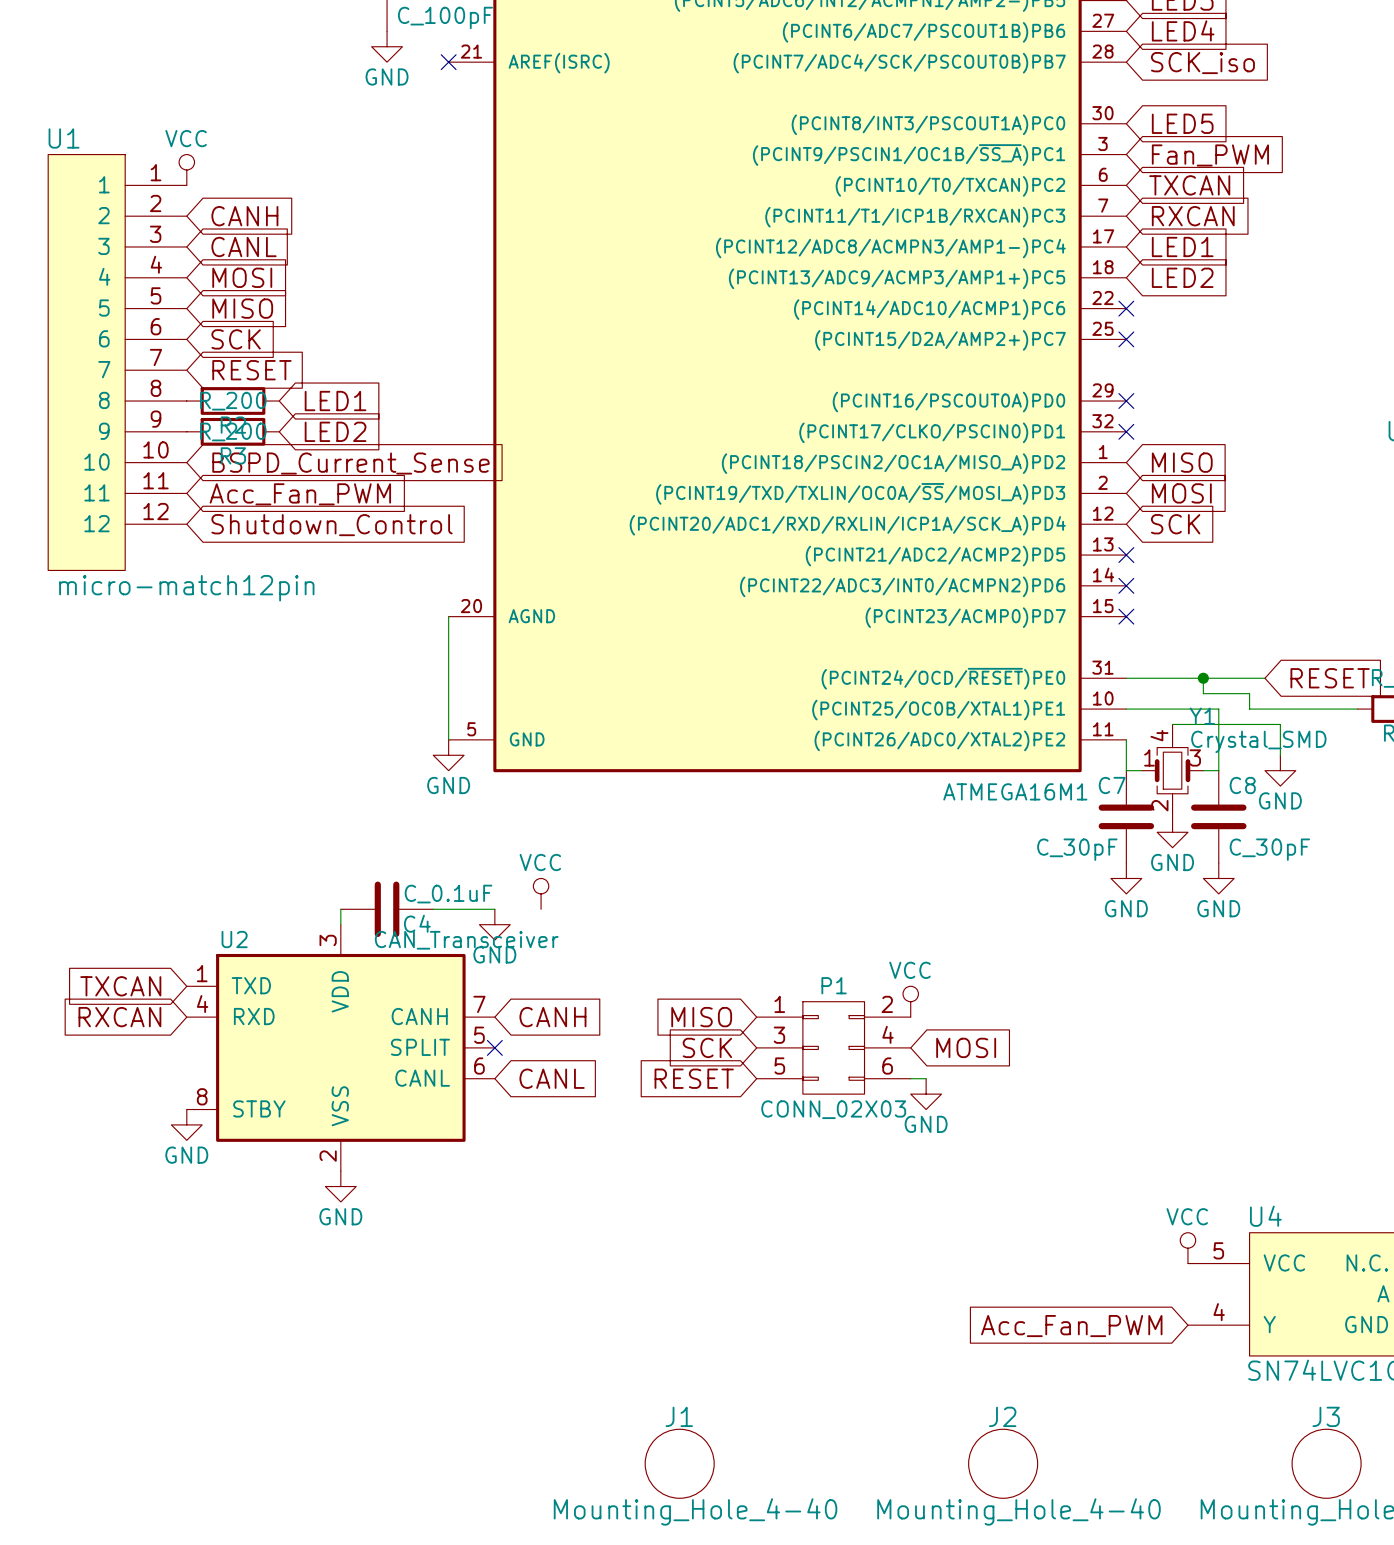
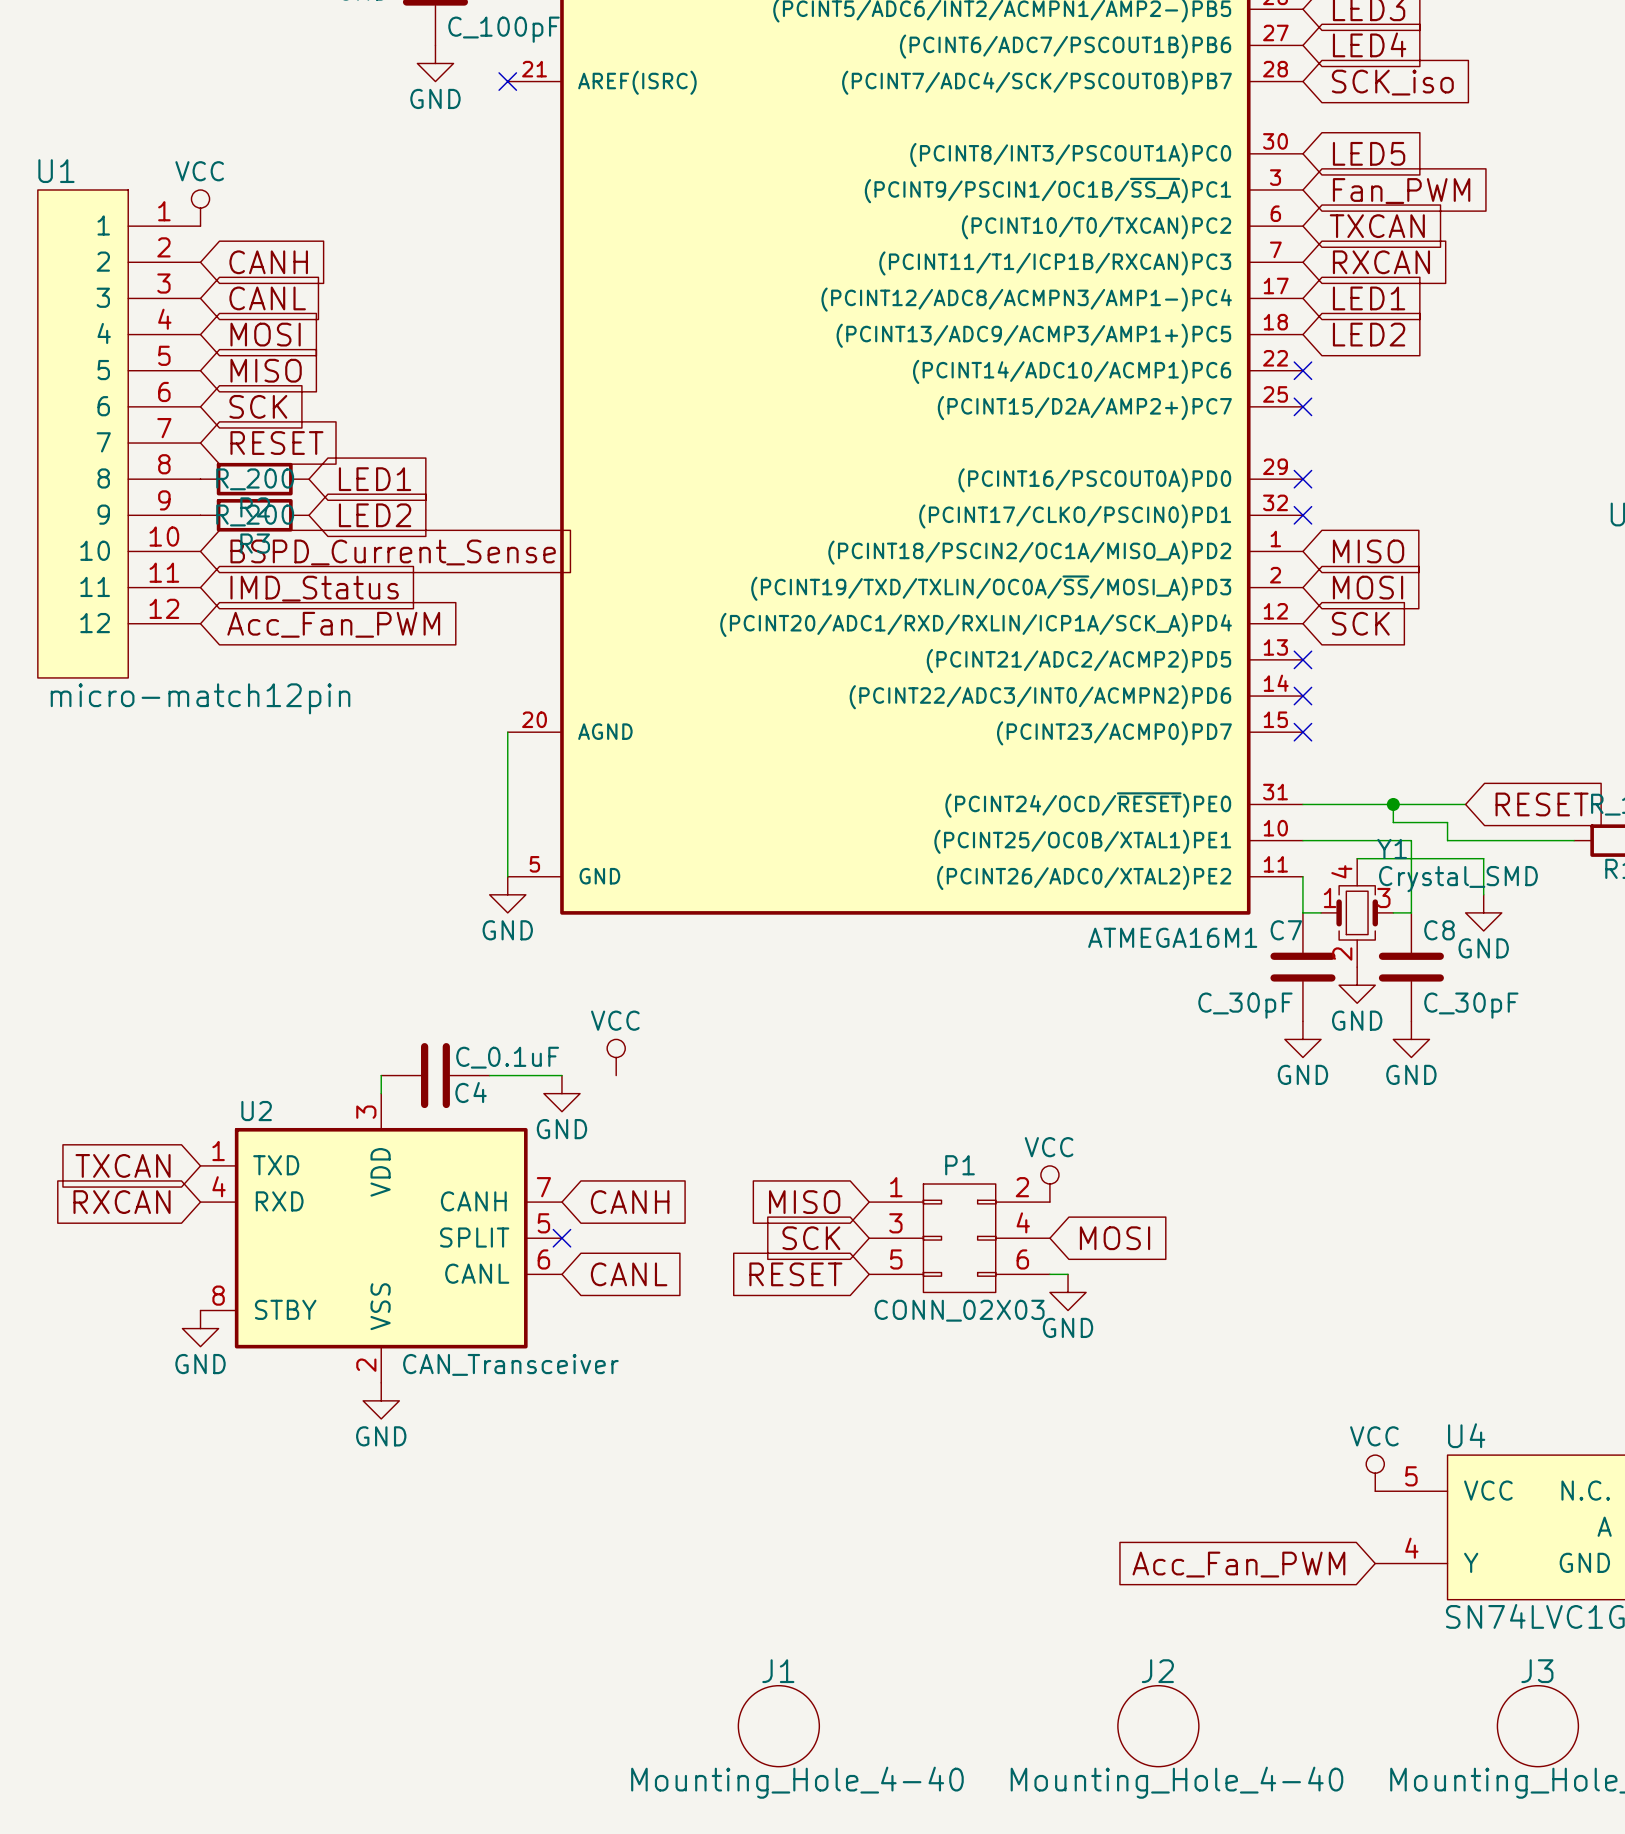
global label: Acc_Fan_PWM (300, 494) -> IMD_Status (314, 588)
global label: Shutdown_Control (332, 525) -> Acc_Fan_PWM (333, 624)
U2 value position: CAN_Transceiver (466, 940) -> CAN_Transceiver (510, 1364)

